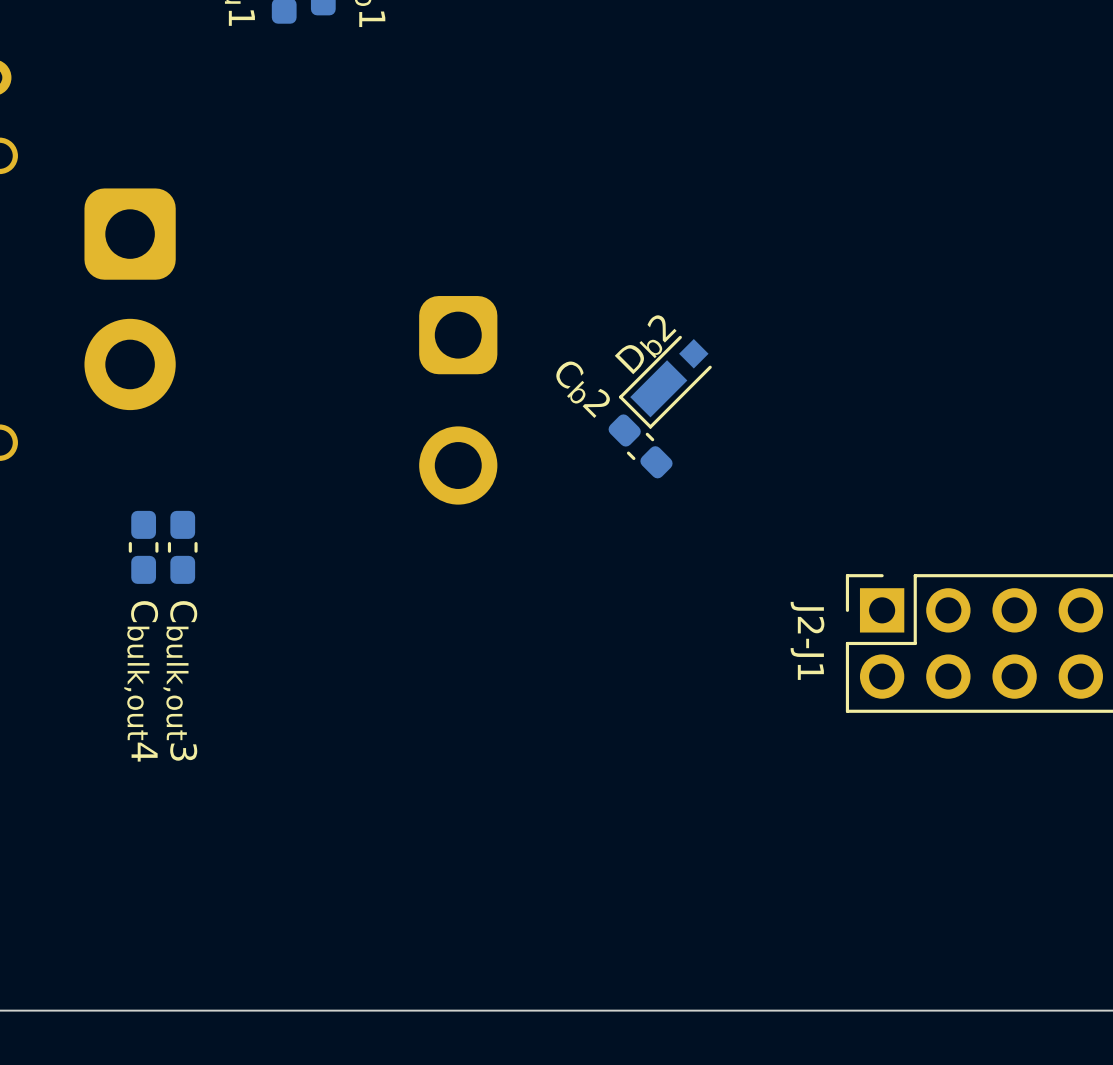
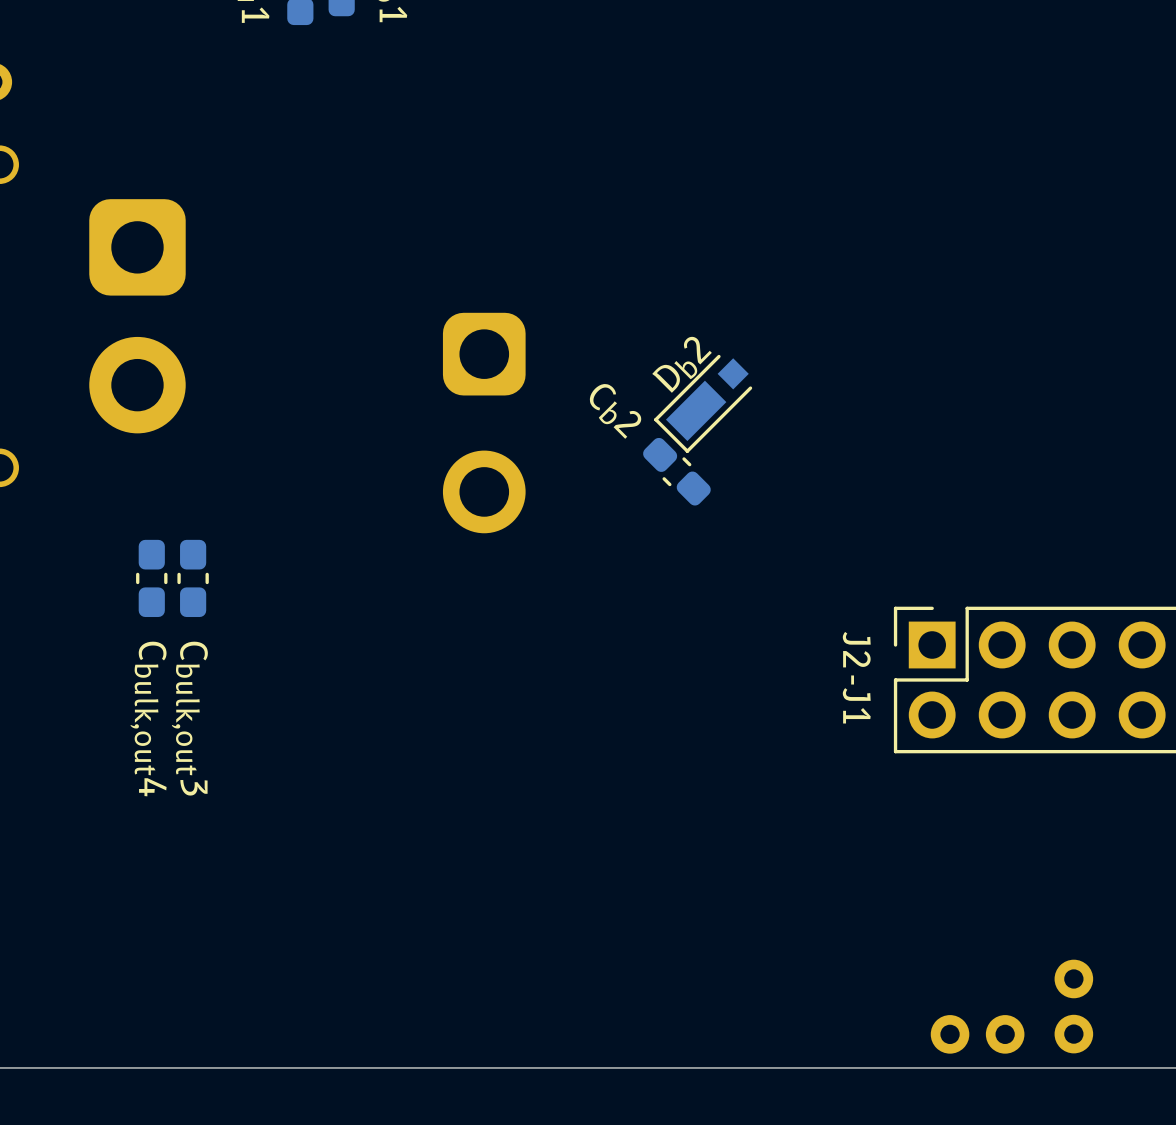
part: none -> (1073, 1006)
part: none -> (977, 1034)

